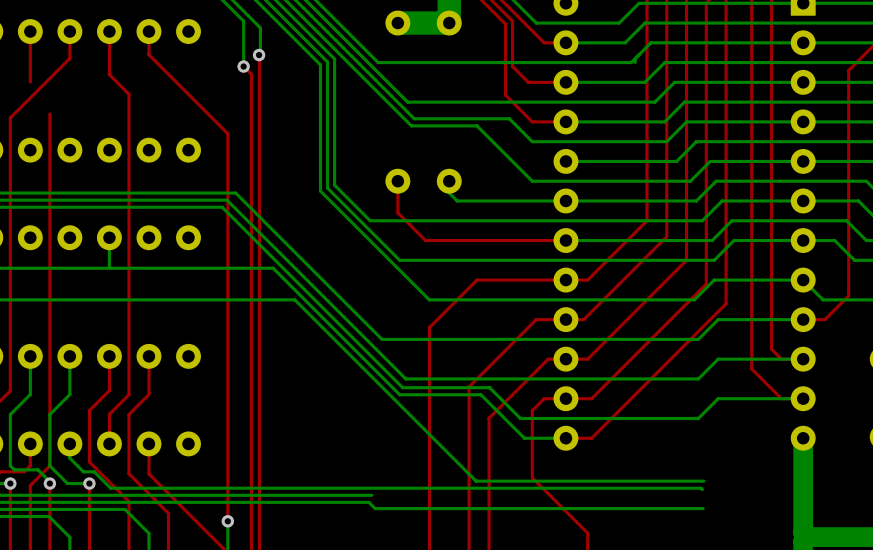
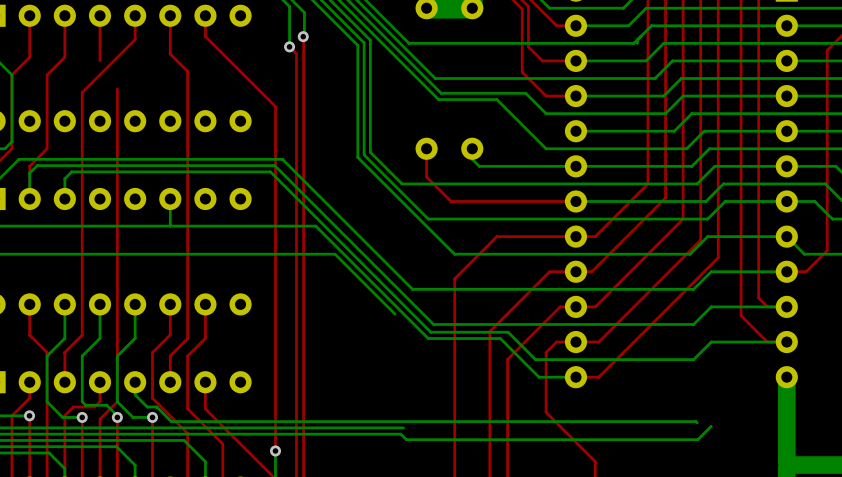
bottom track: (362, 367) (476, 481) (703, 481) -> none
bottom track: none -> (711, 426) (697, 439)

